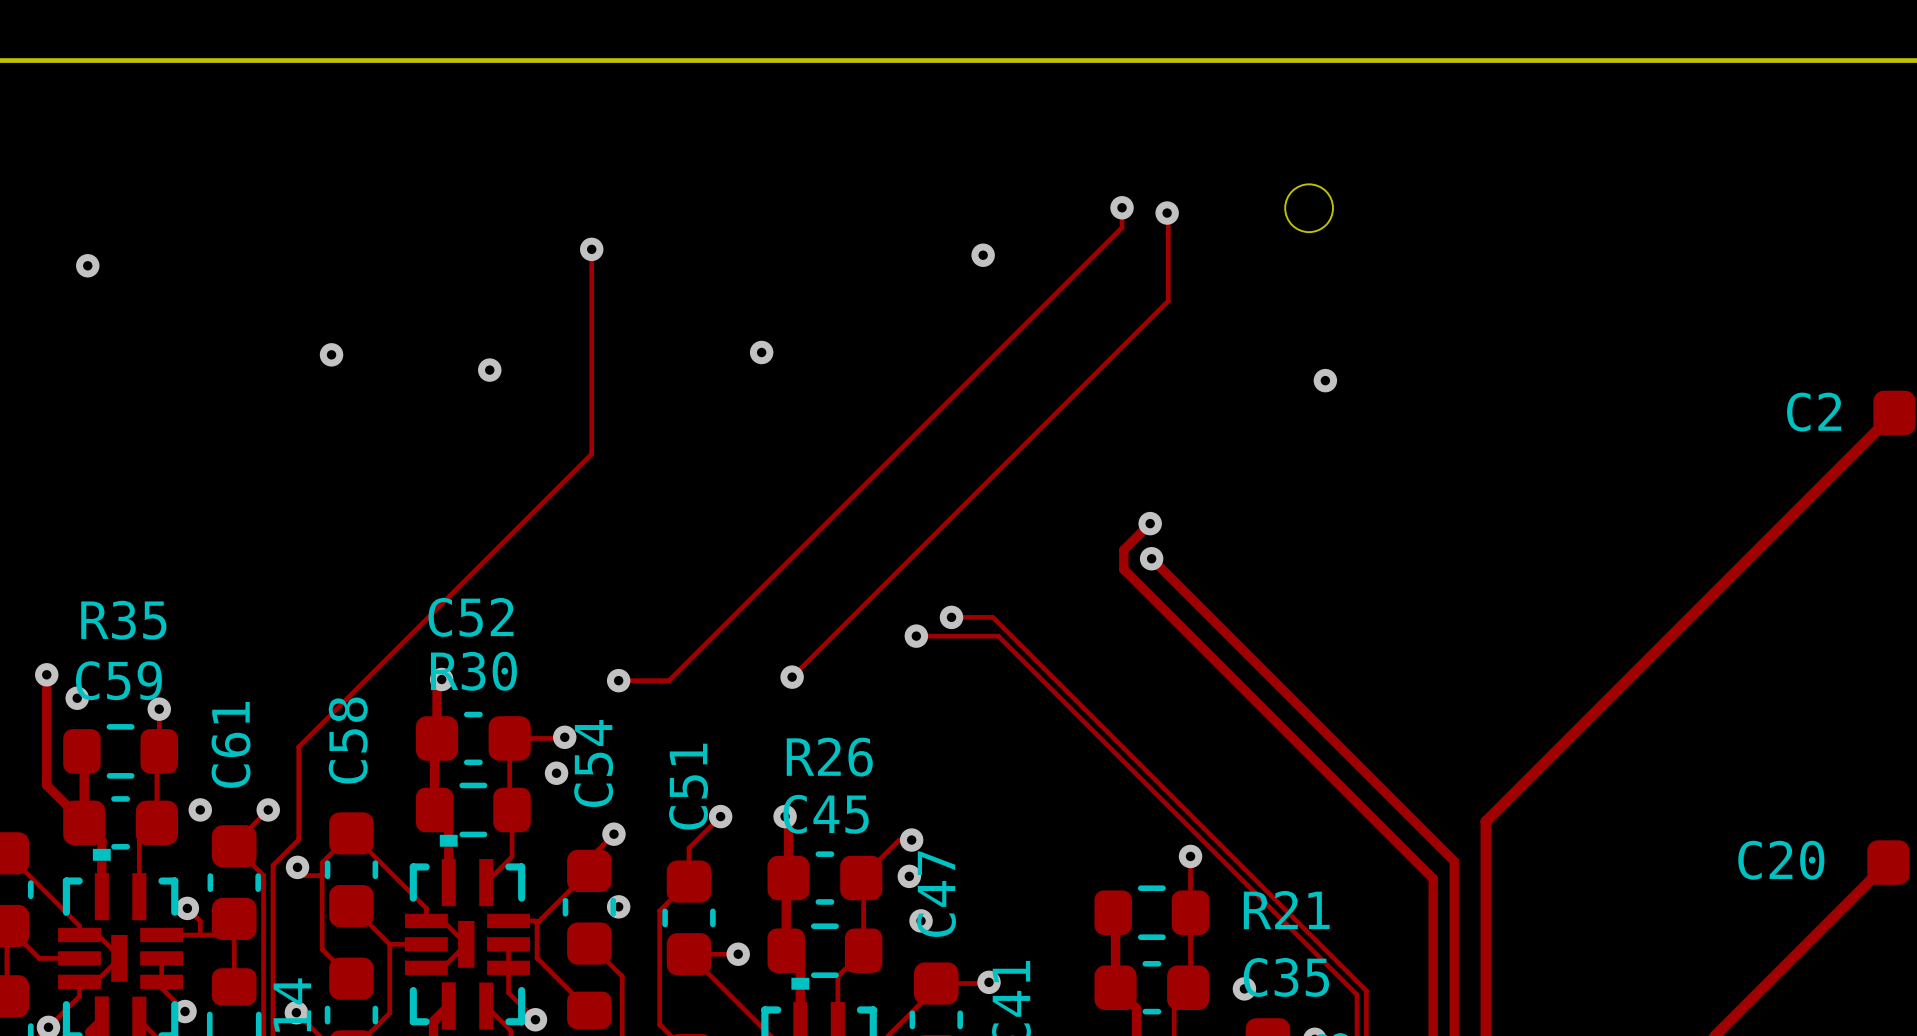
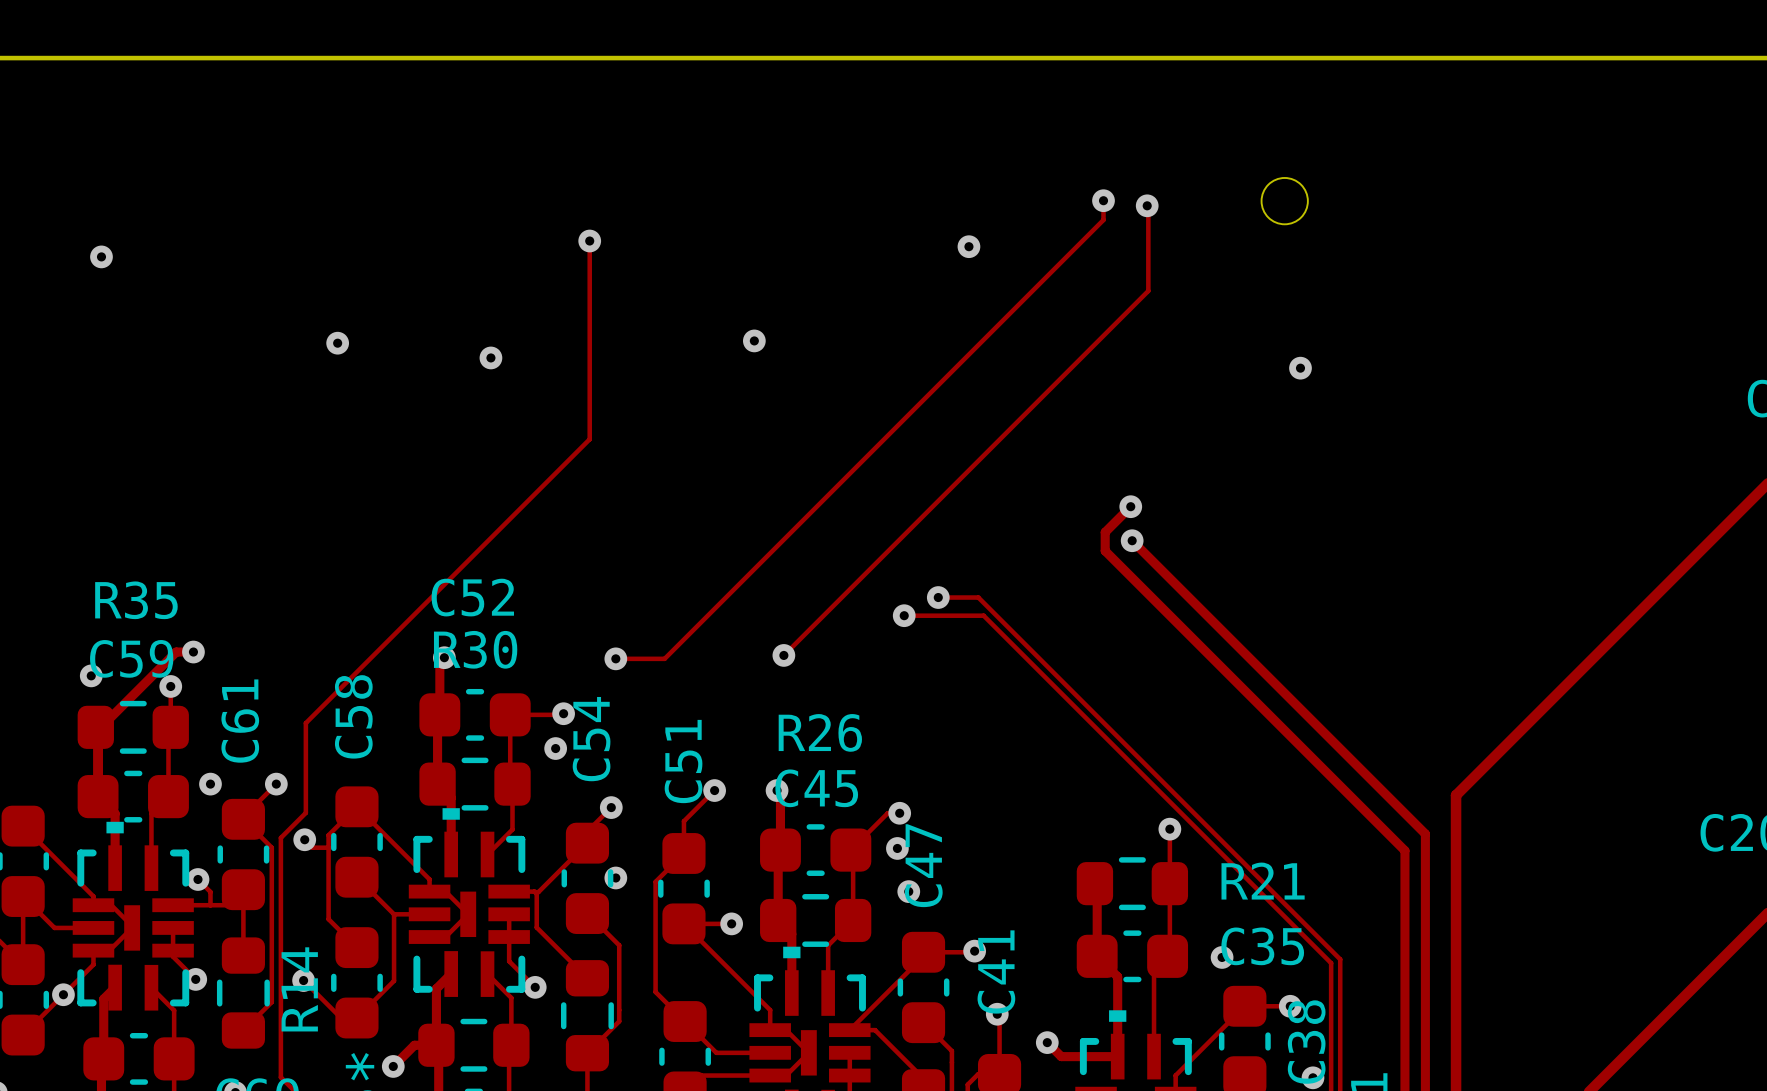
track: none -> (193, 652) (176, 652) (98, 730)
track: (46, 674) (46, 785) (84, 822) -> none
via position: (46, 674) -> (193, 652)

